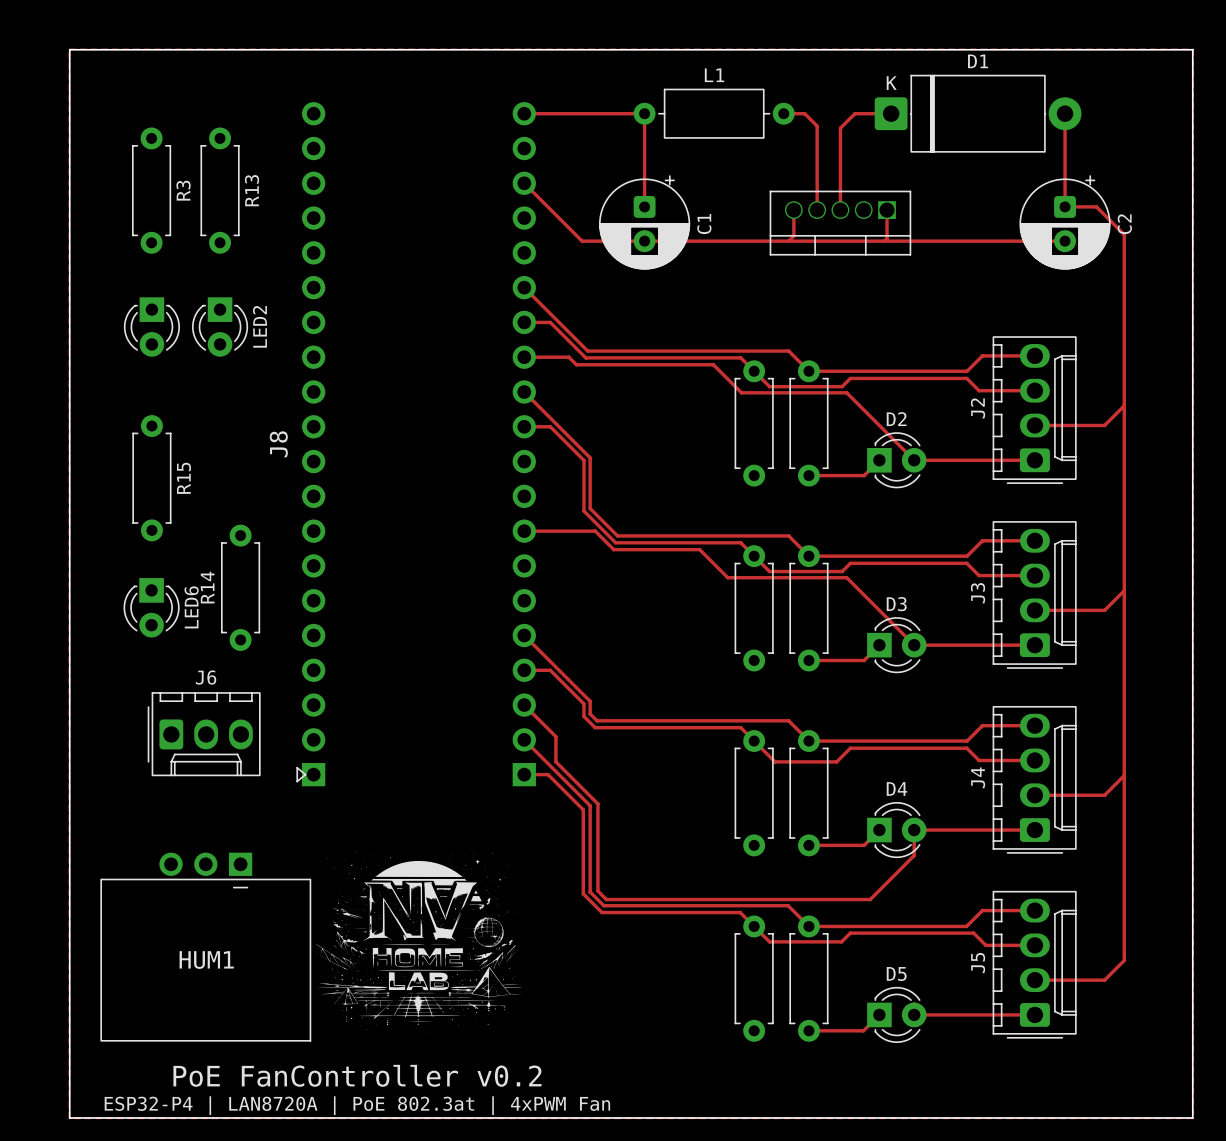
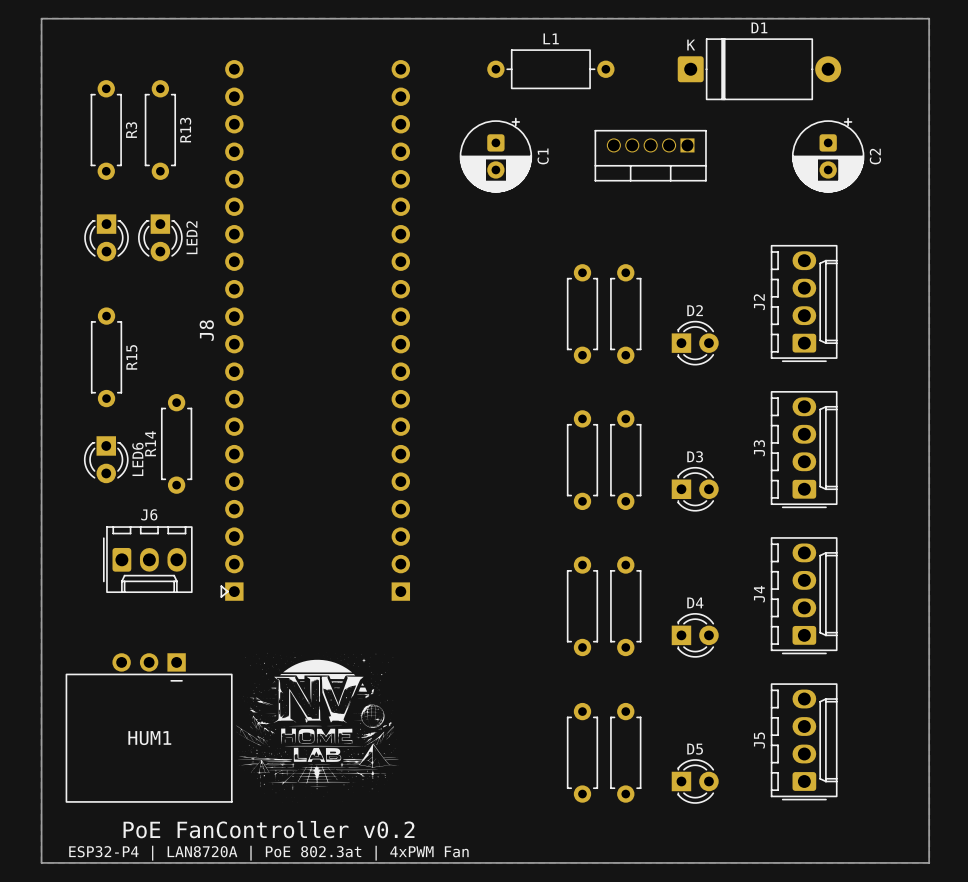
track: (524, 113) (644, 113) (644, 206) -> none
track: (783, 113) (804, 113) (817, 126) (817, 210) -> none
track: (891, 113) (854, 113) (840, 128) (840, 210) -> none
track: (1065, 113) (1065, 206) (1096, 206) (1124, 234) (1124, 960) (1104, 980) (1034, 980) -> none
track: (524, 183) (582, 241) (1065, 241) -> none
track: (793, 210) (793, 236) (788, 241) -> none
track: (887, 210) (887, 238) (884, 241) -> none
track: (524, 287) (587, 351) (788, 351) (808, 371) (967, 371) (982, 355) (1034, 355) -> none
track: (524, 322) (550, 322) (585, 357) (740, 357) (769, 386) (842, 386) (850, 378) (966, 378) (979, 390) (1034, 390) -> none
track: (524, 357) (568, 357) (576, 364) (713, 364) (741, 392) (846, 392) (914, 460) (1034, 460) -> none
track: (524, 392) (590, 457) (590, 508) (617, 535) (788, 535) (808, 556) (967, 556) (982, 540) (1034, 540) -> none
track: (1124, 405) (1104, 425) (1034, 425) -> none
track: (524, 426) (550, 426) (584, 460) (584, 511) (615, 542) (740, 542) (769, 571) (842, 571) (850, 563) (966, 563) (979, 575) (1034, 575) -> none
track: (879, 460) (864, 475) (808, 475) -> none
track: (595, 530) (613, 549) (699, 549) (727, 577) (846, 577) (914, 645) (1034, 645) -> none
track: (524, 531) (594, 531) -> none
track: (1124, 590) (1104, 610) (1034, 610) -> none
track: (524, 635) (590, 701) (590, 713) (597, 720) (788, 720) (808, 741) (967, 741) (982, 725) (1034, 725) -> none
track: (879, 645) (864, 660) (808, 660) -> none
track: (524, 670) (550, 670) (584, 703) (584, 716) (595, 727) (740, 727) (775, 761) (836, 761) (850, 748) (966, 748) (979, 760) (1034, 760) -> none
track: (524, 705) (555, 736) (555, 761) (597, 803) (597, 891) (606, 899) (870, 899) (914, 855) (914, 830) (1034, 830) -> none
track: (524, 739) (590, 805) (590, 892) (603, 905) (788, 905) (808, 926) (966, 926) (982, 910) (1034, 910) -> none
track: (524, 774) (548, 774) (583, 809) (583, 893) (601, 912) (740, 912) (769, 941) (841, 941) (850, 933) (973, 933) (985, 945) (1034, 945) -> none
track: (1124, 775) (1104, 795) (1034, 795) -> none
track: (879, 830) (864, 845) (808, 845) -> none
track: (914, 1003) (914, 1014) (1034, 1014) -> none
track: (879, 1014) (863, 1030) (808, 1030) -> none

